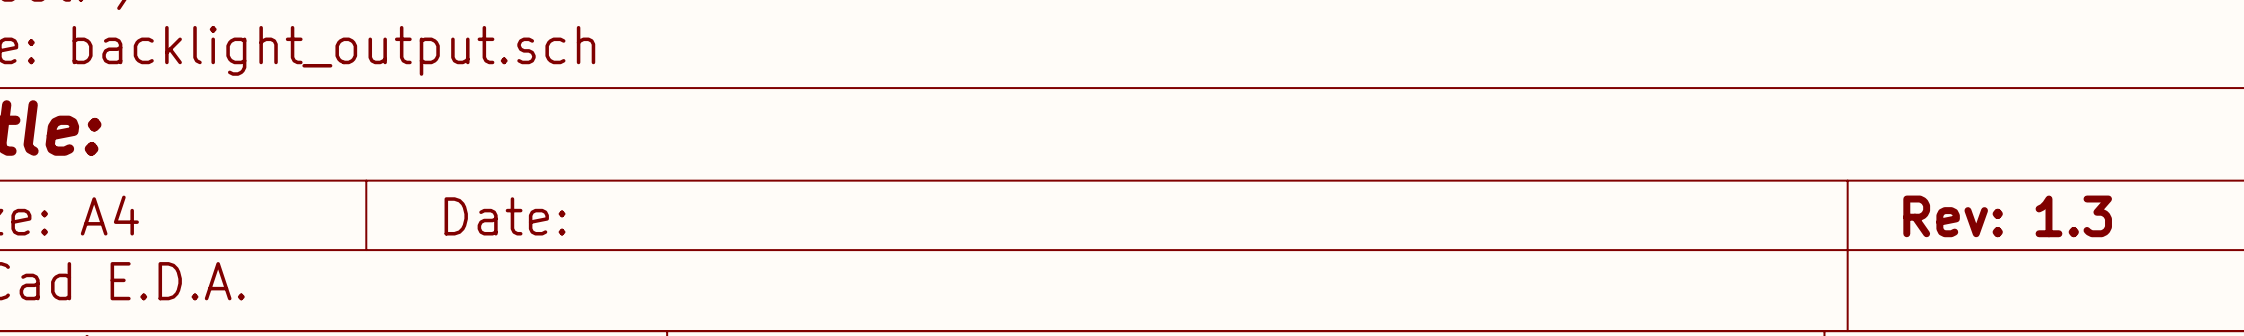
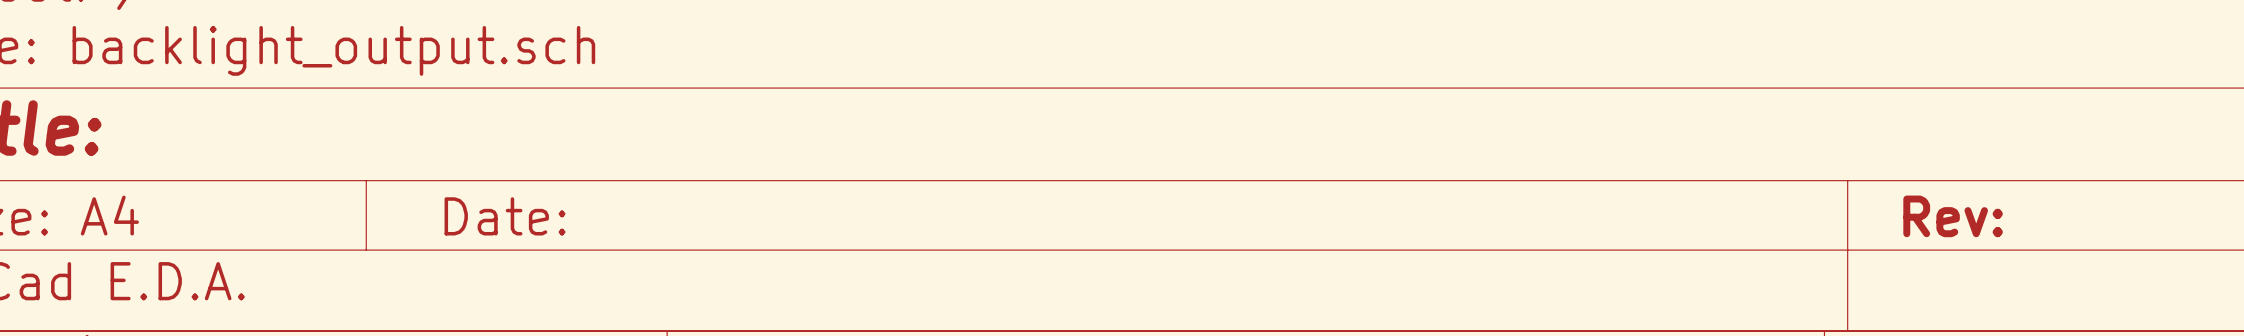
title block: Rev: 1.3 (2007, 216) -> Rev: (1953, 216)

